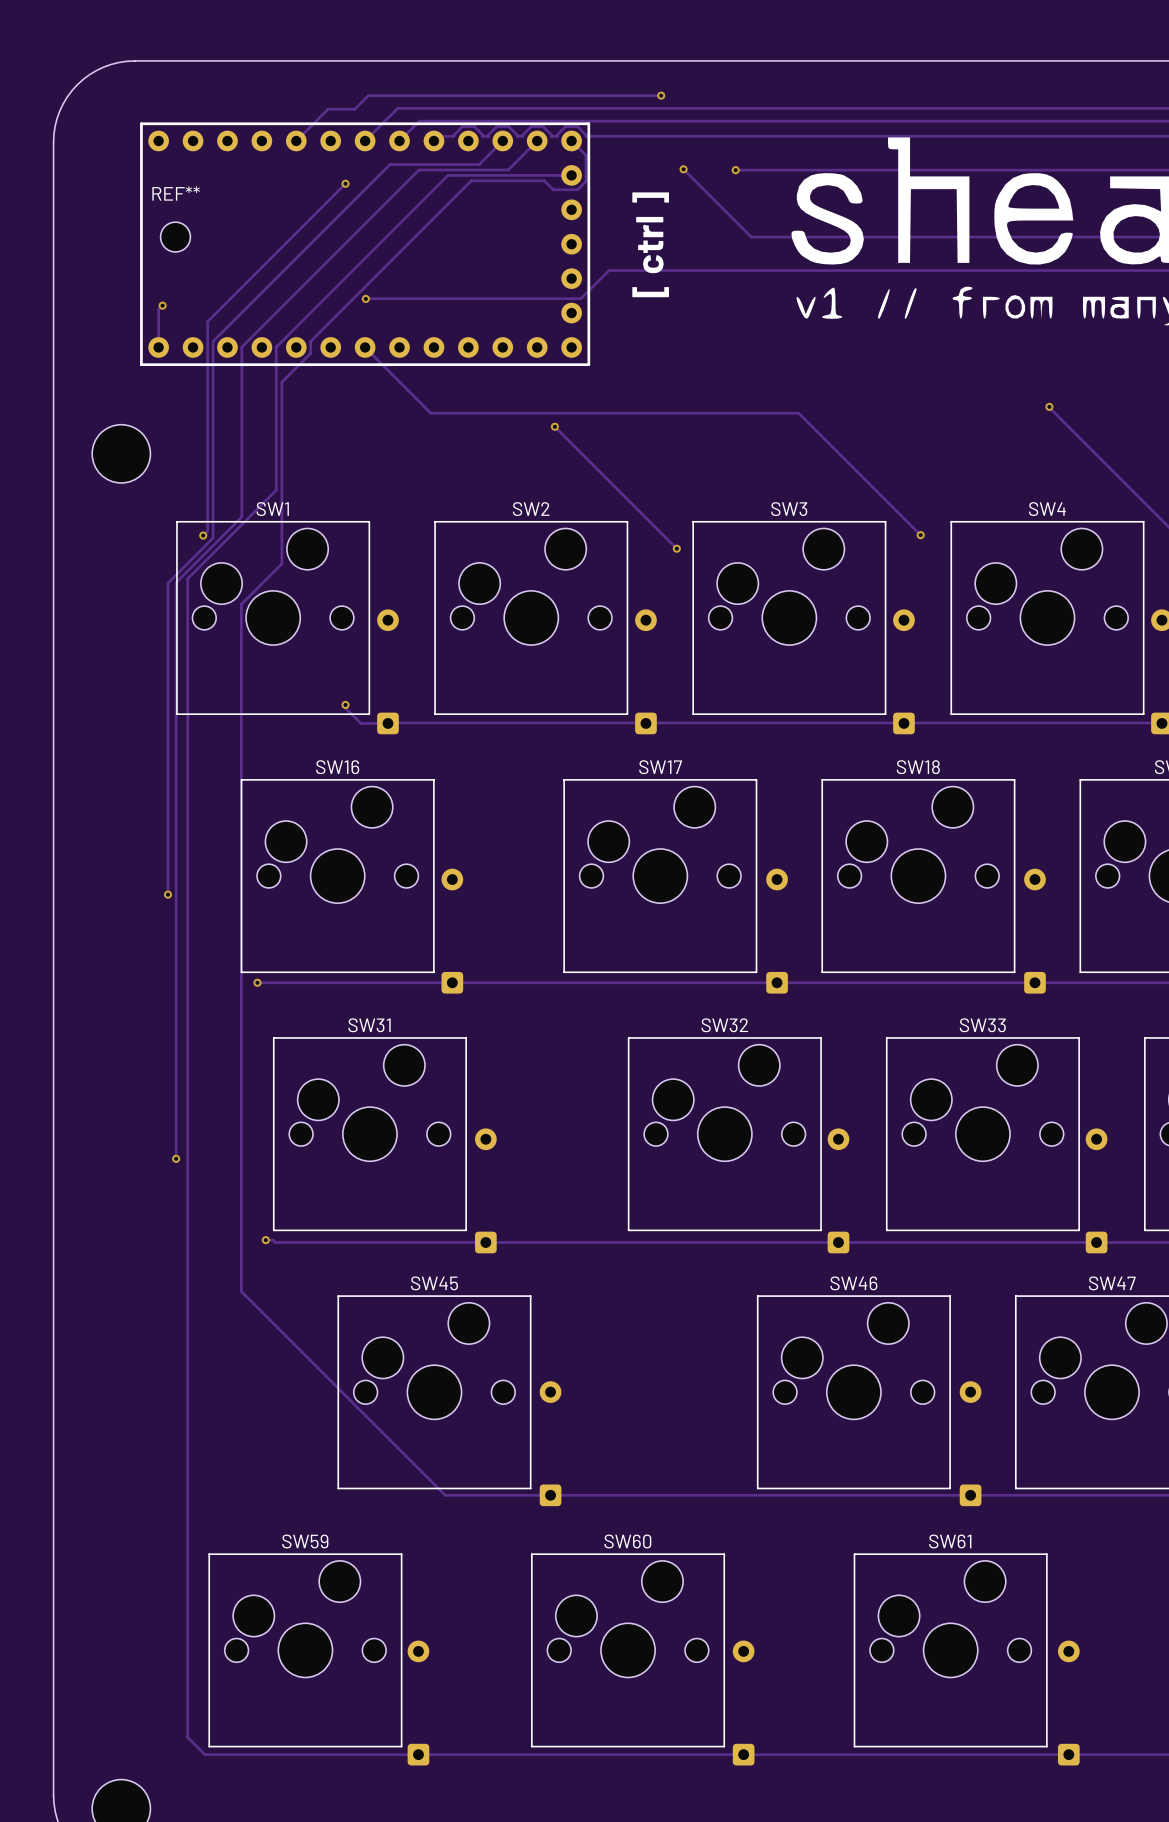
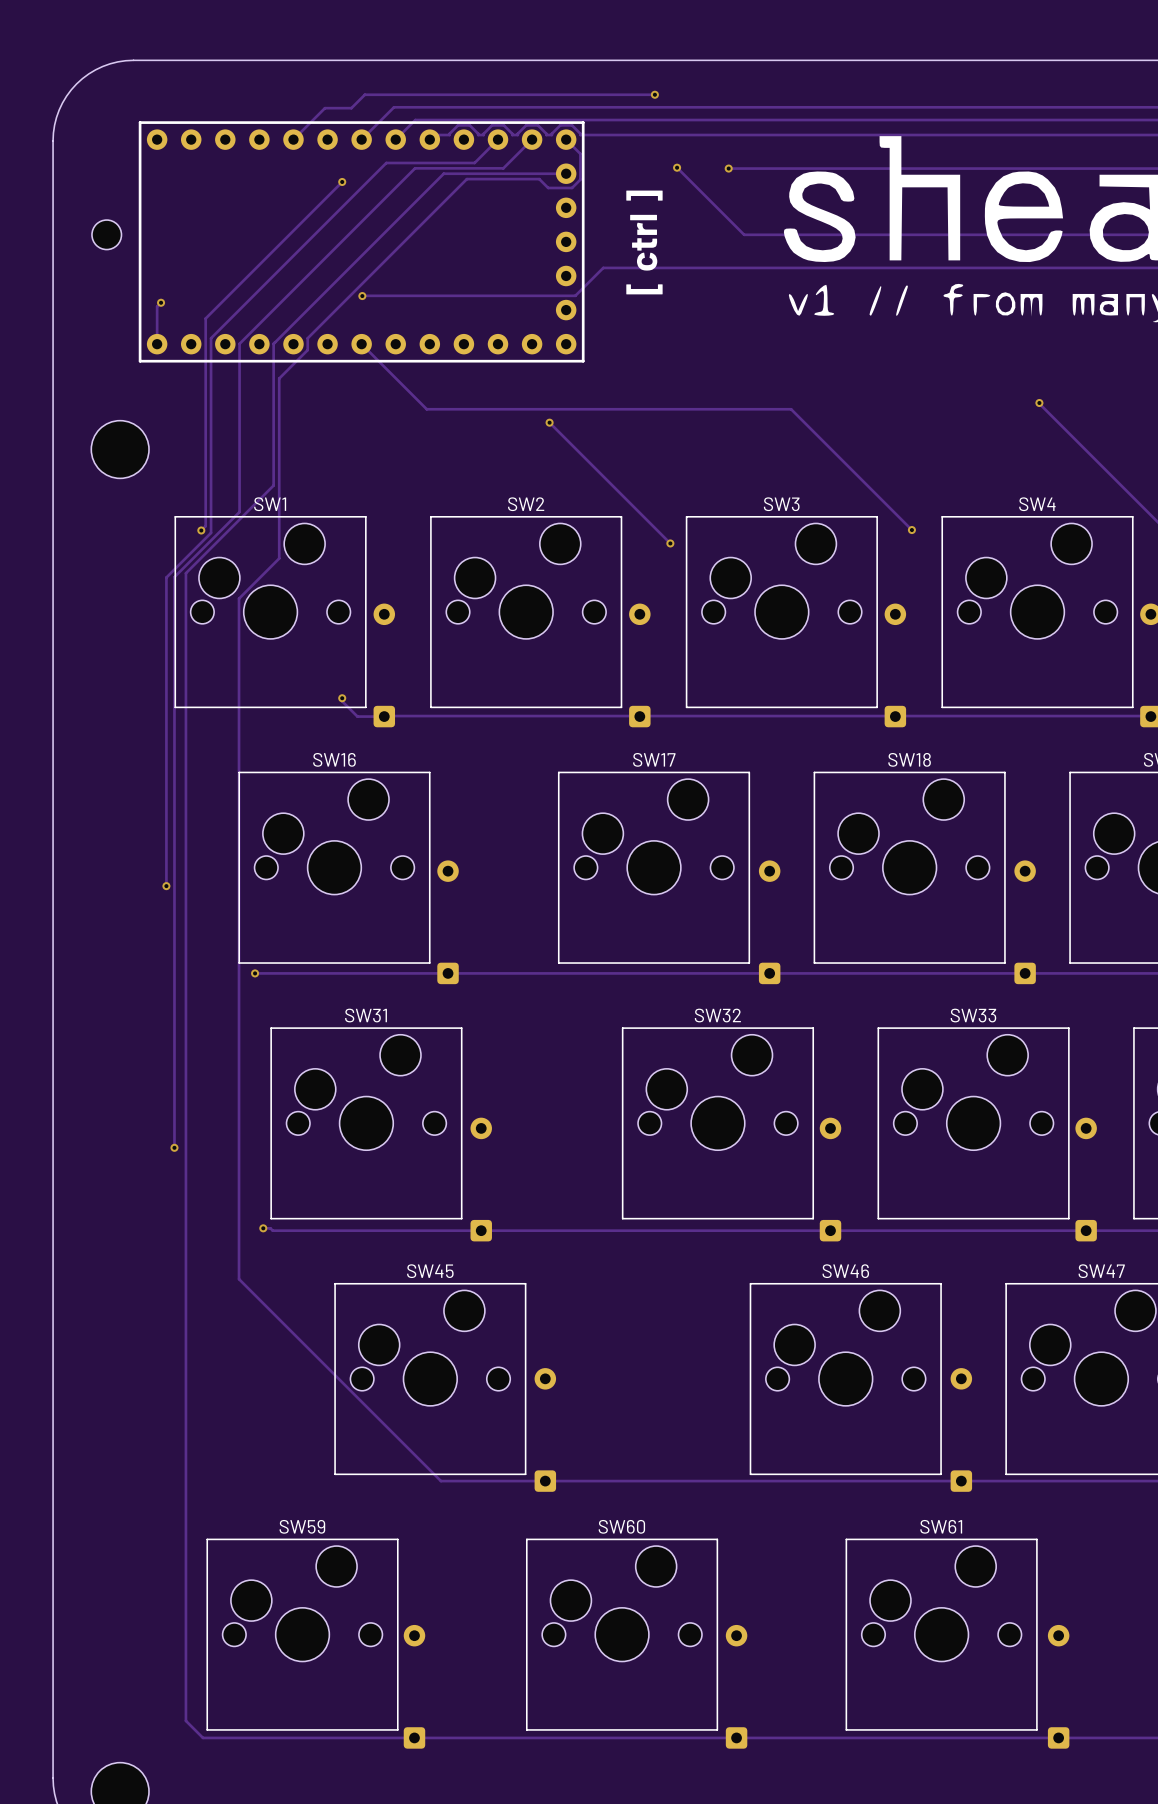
part: none -> (106, 234)
REF**: (175, 237) -> none

